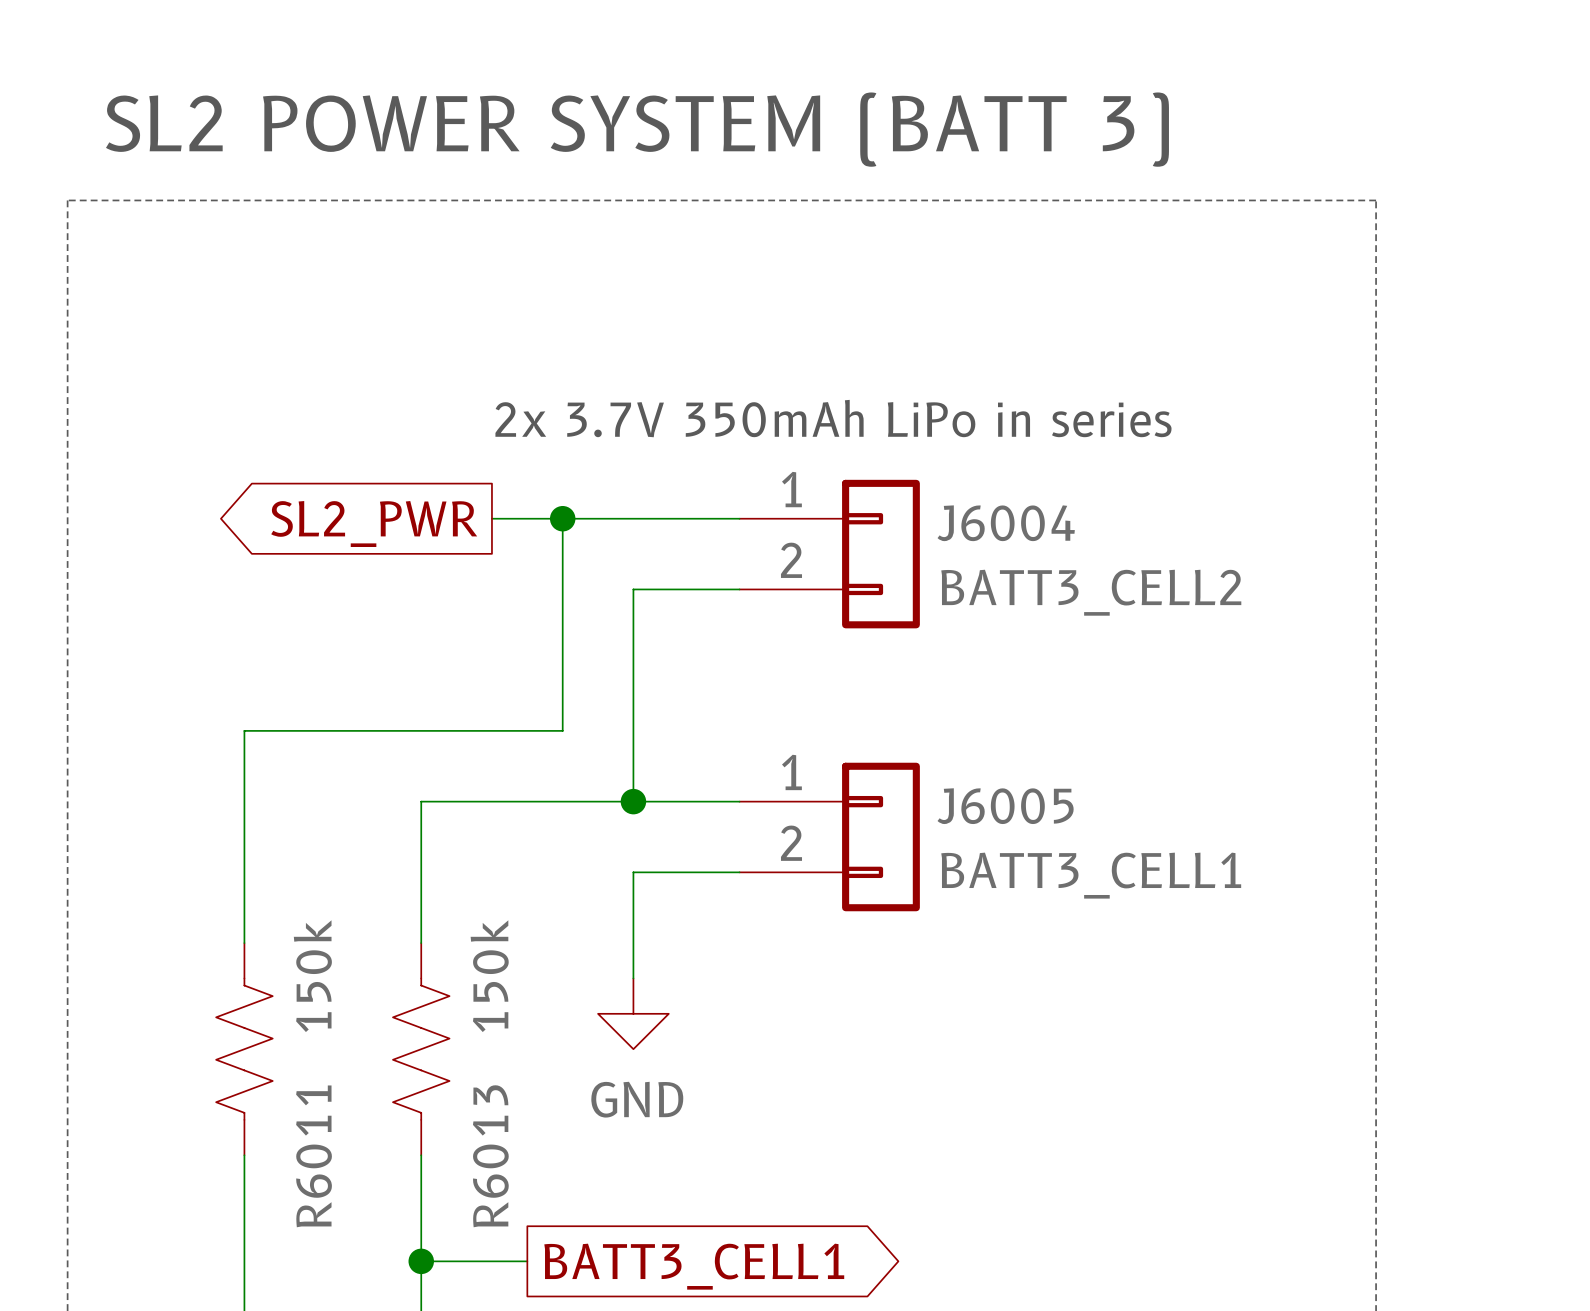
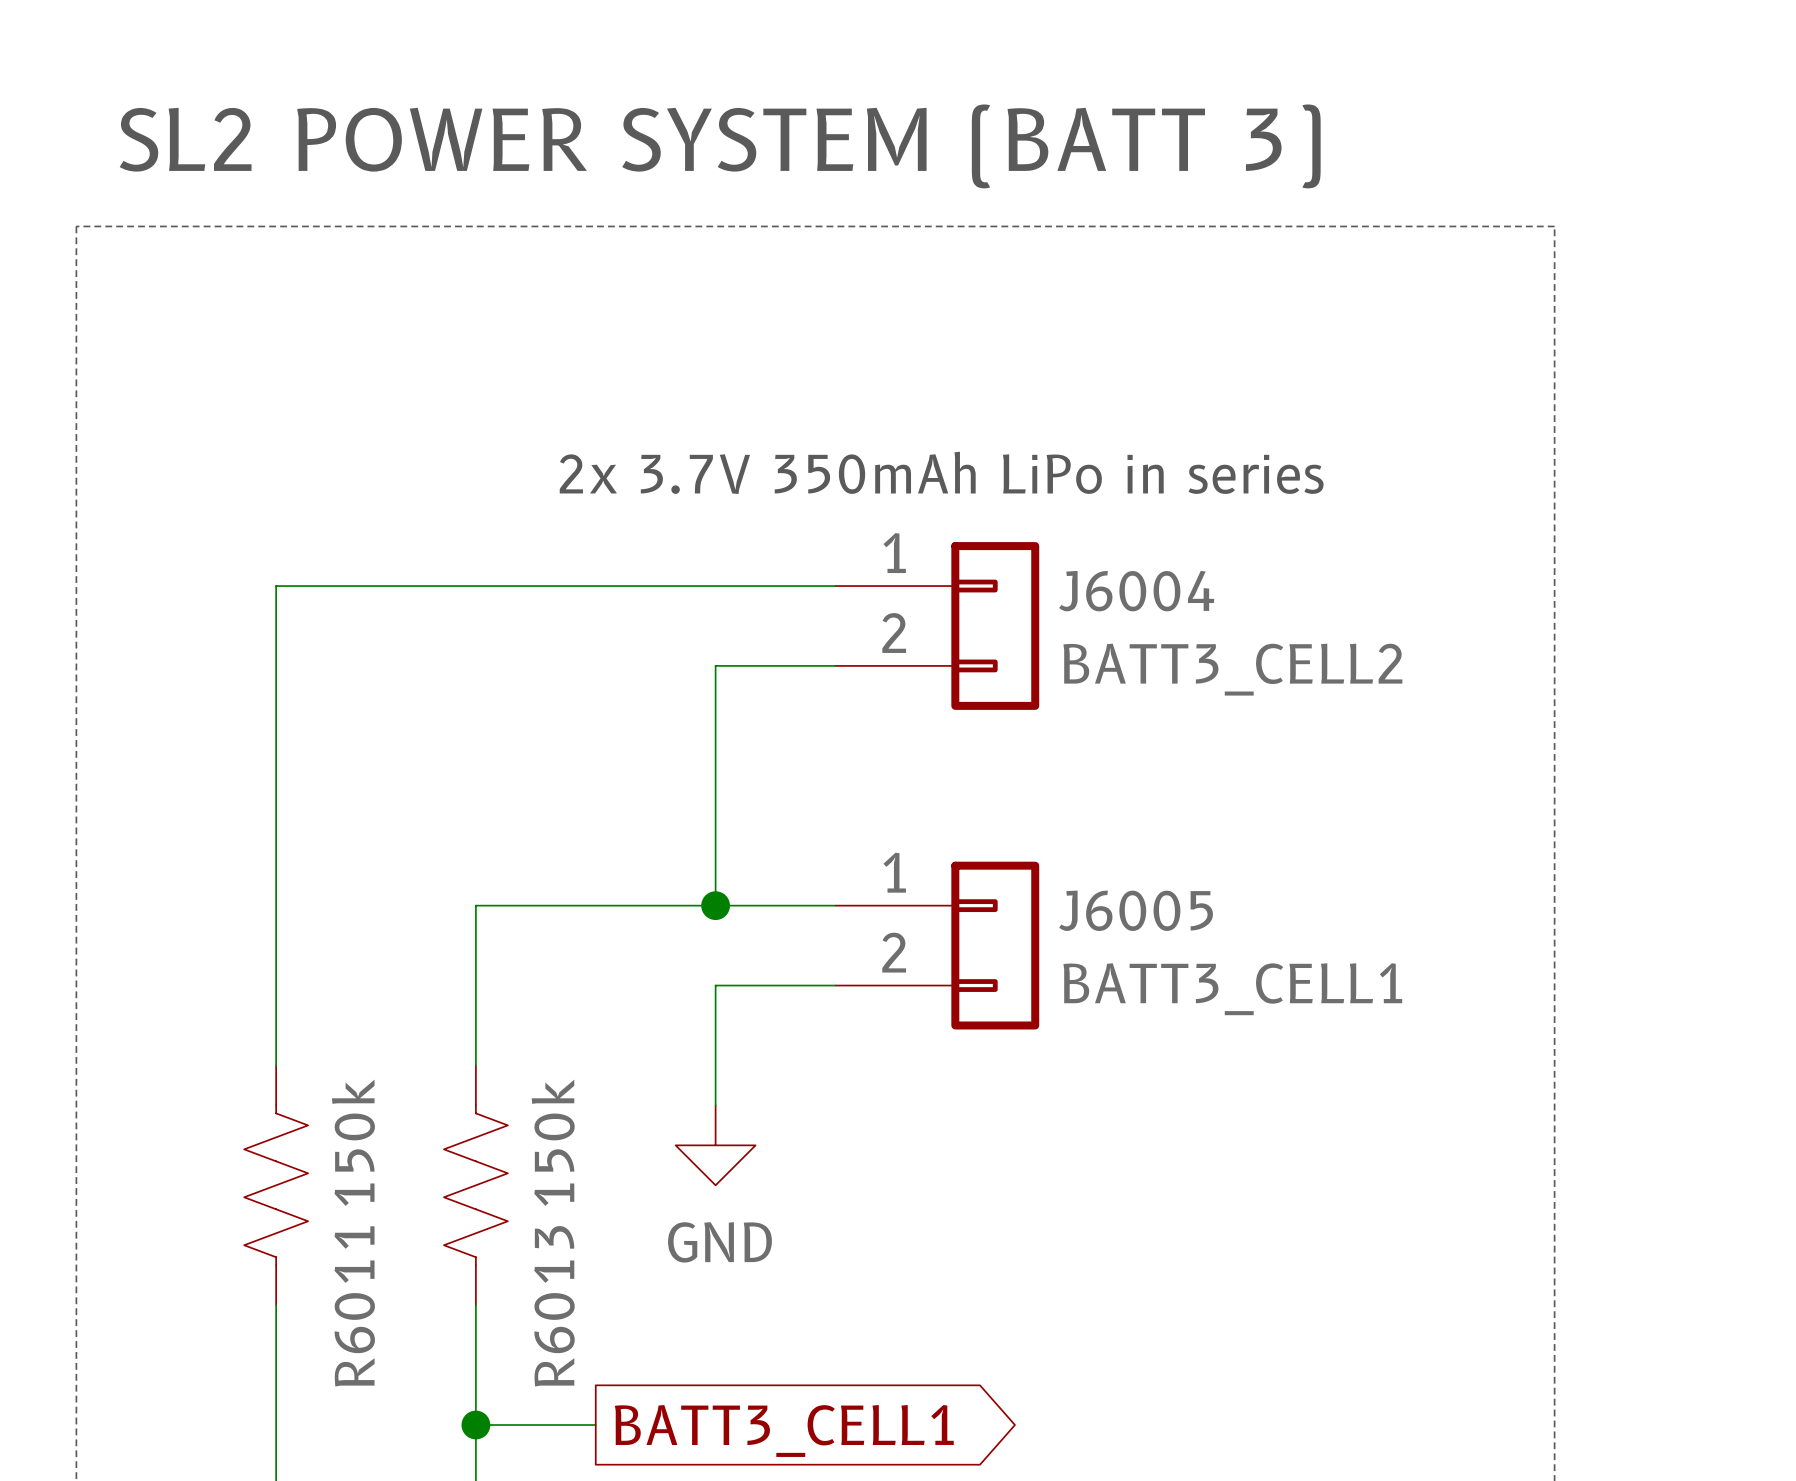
wire: (562, 518) (562, 730) (244, 730) -> (555, 586) (276, 586) (276, 825)
junction: (562, 518) -> none
global label: SL2_PWR (374, 524) -> none
R6011 value position: 150k (312, 976) -> 150k (353, 1142)
R6013 value position: 150k (489, 976) -> 150k (553, 1142)

